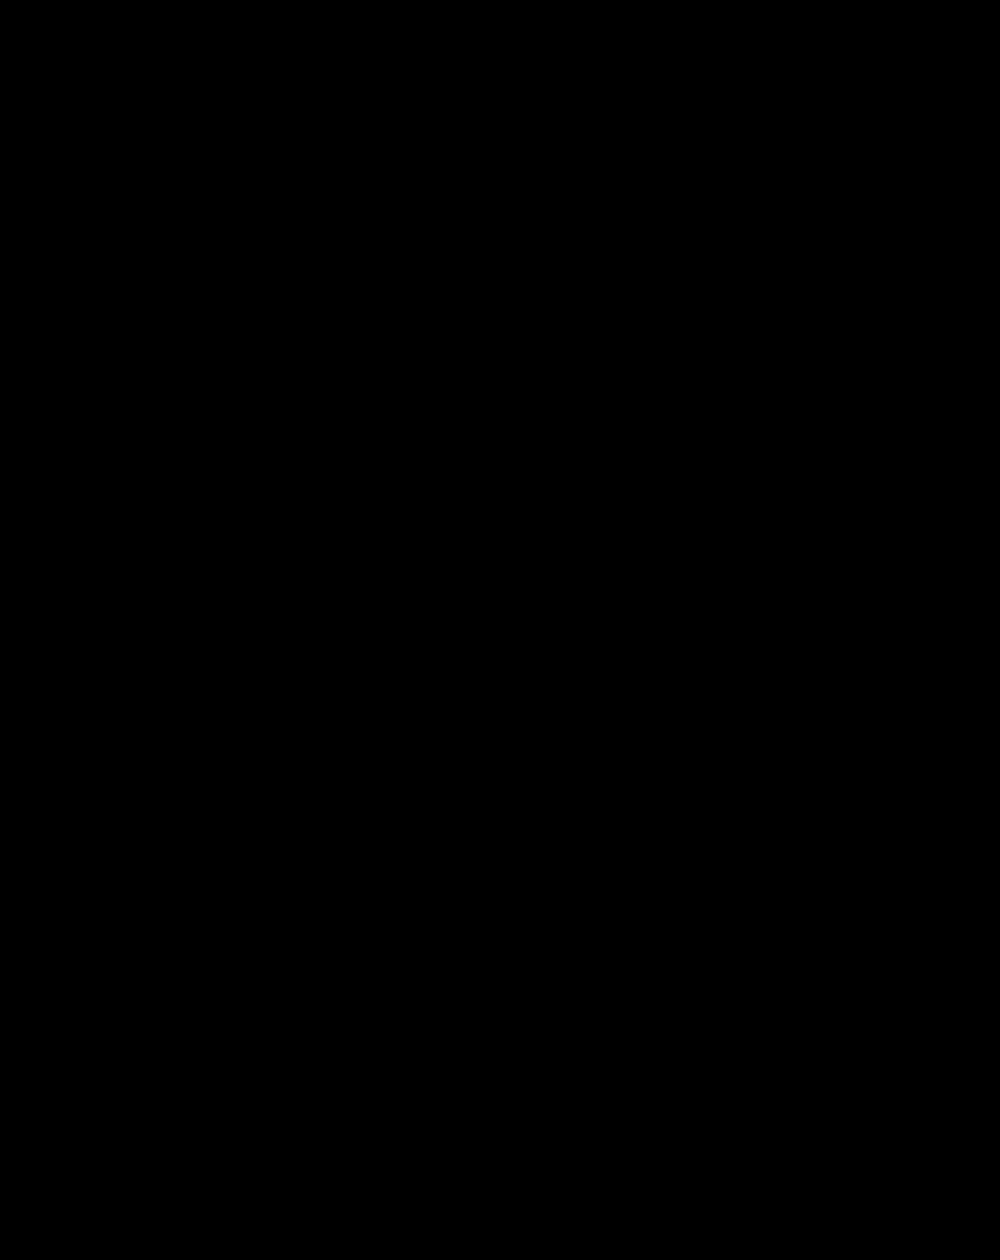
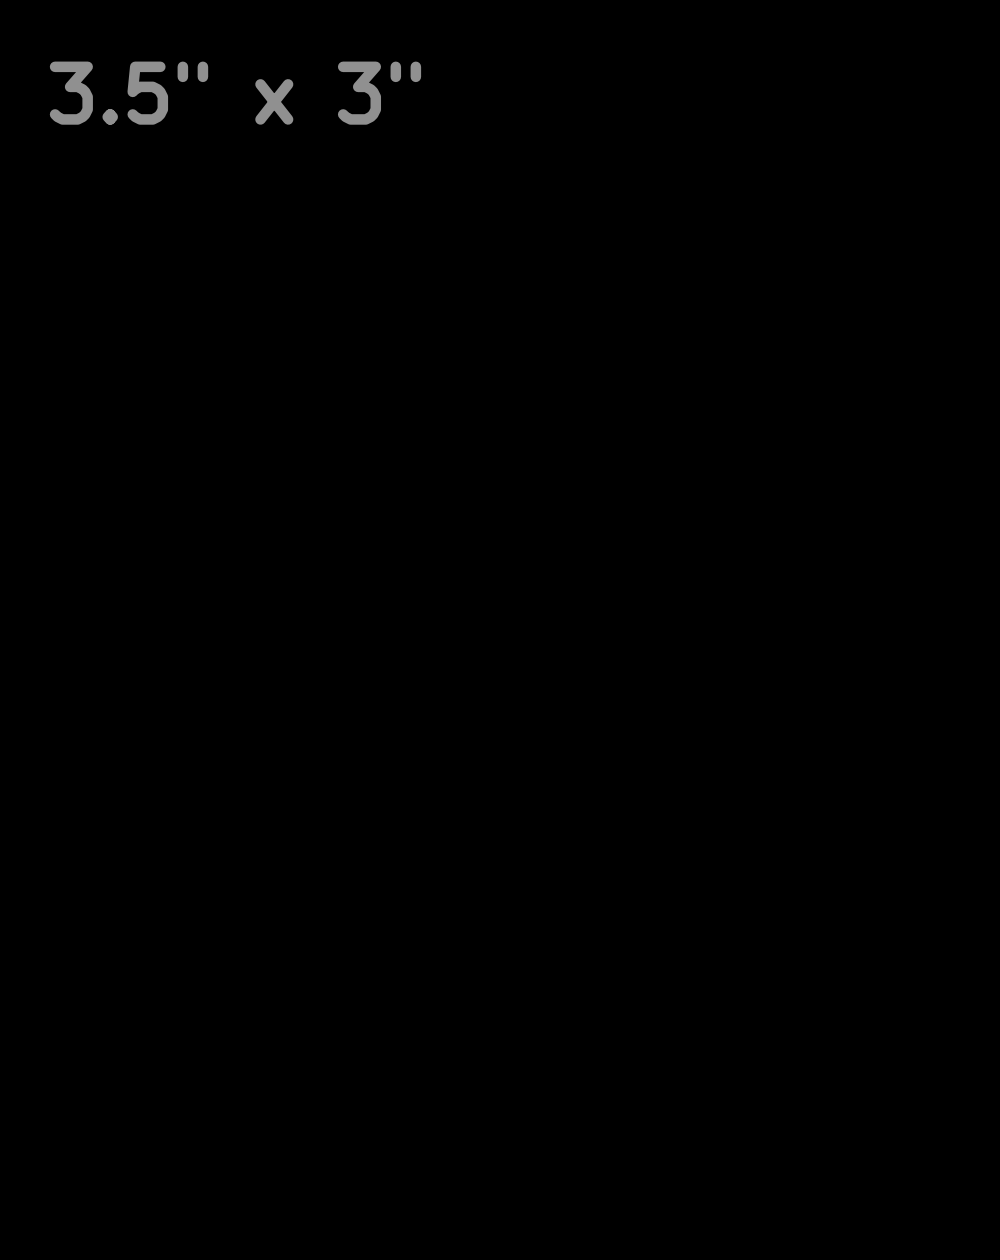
text: none -> 3.5" x 3" (235, 93)

